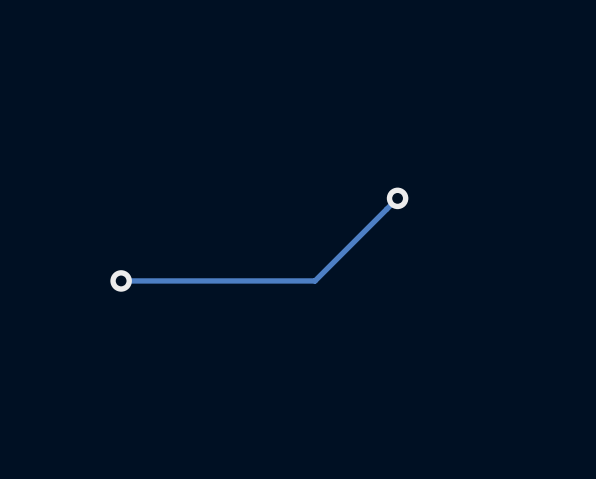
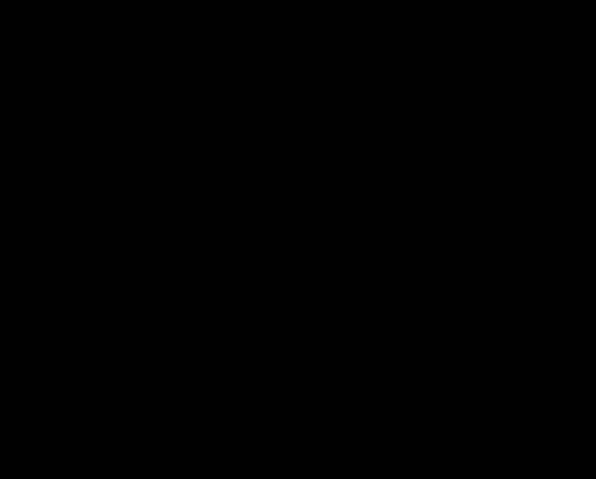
track: (397, 198) (315, 280) (121, 280) -> none
via: (397, 198) -> none
via: (121, 280) -> none

